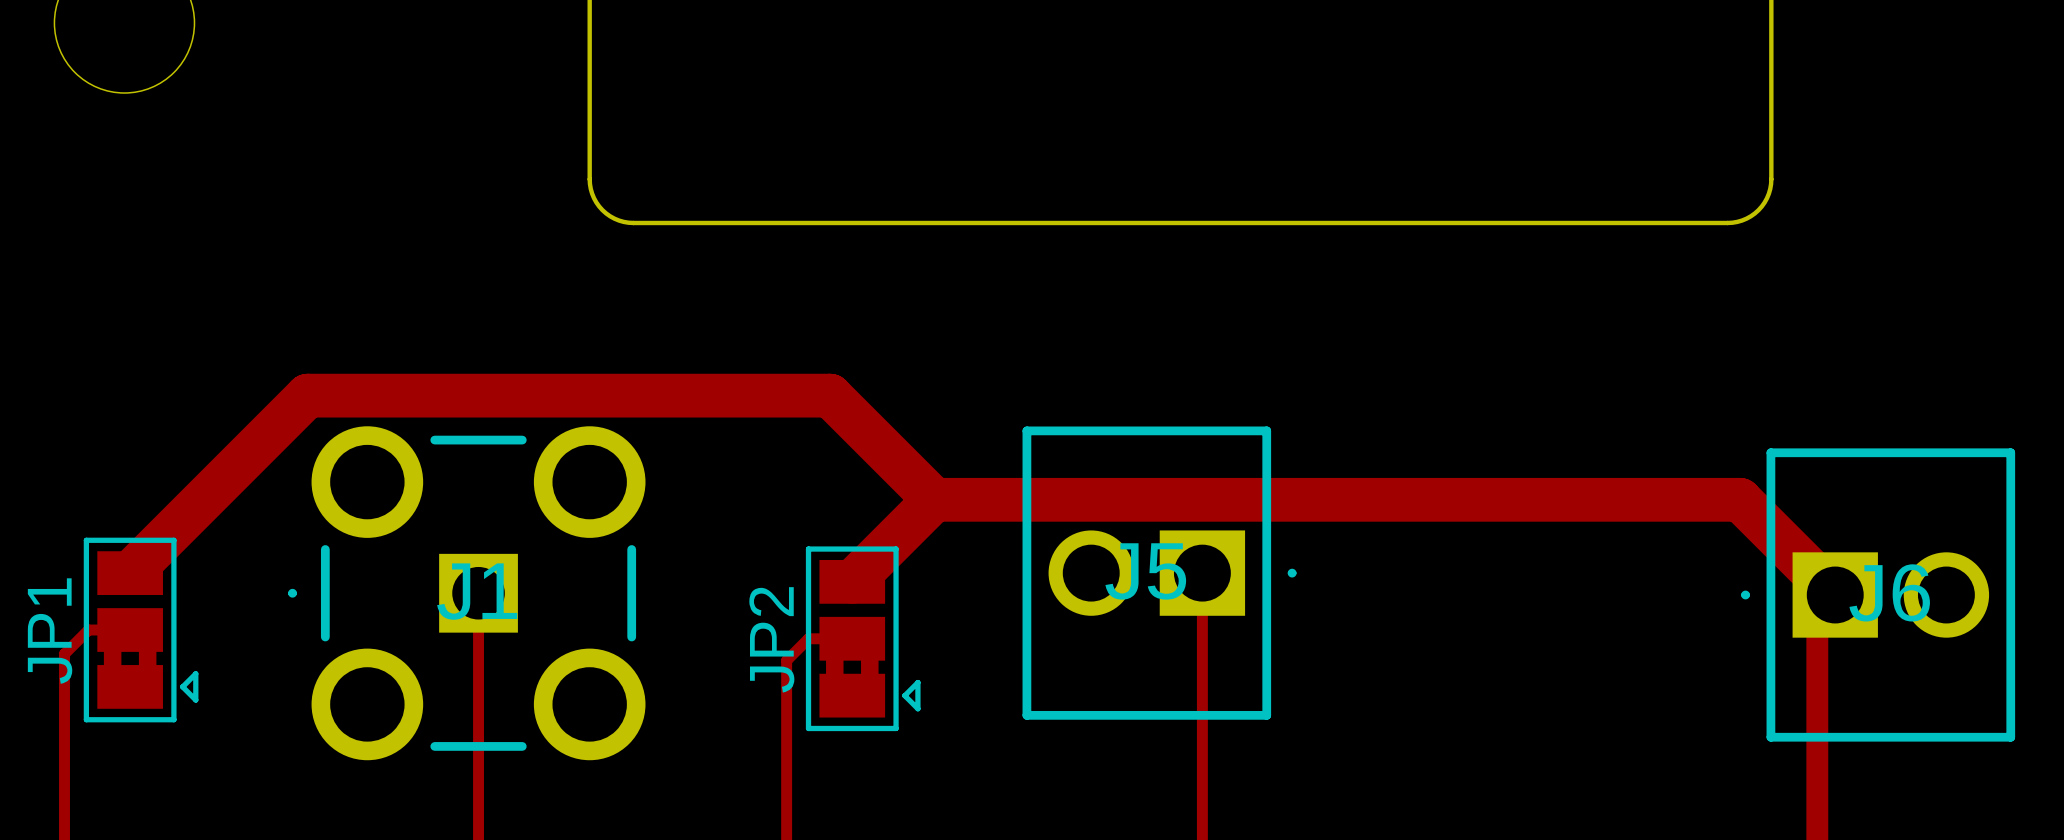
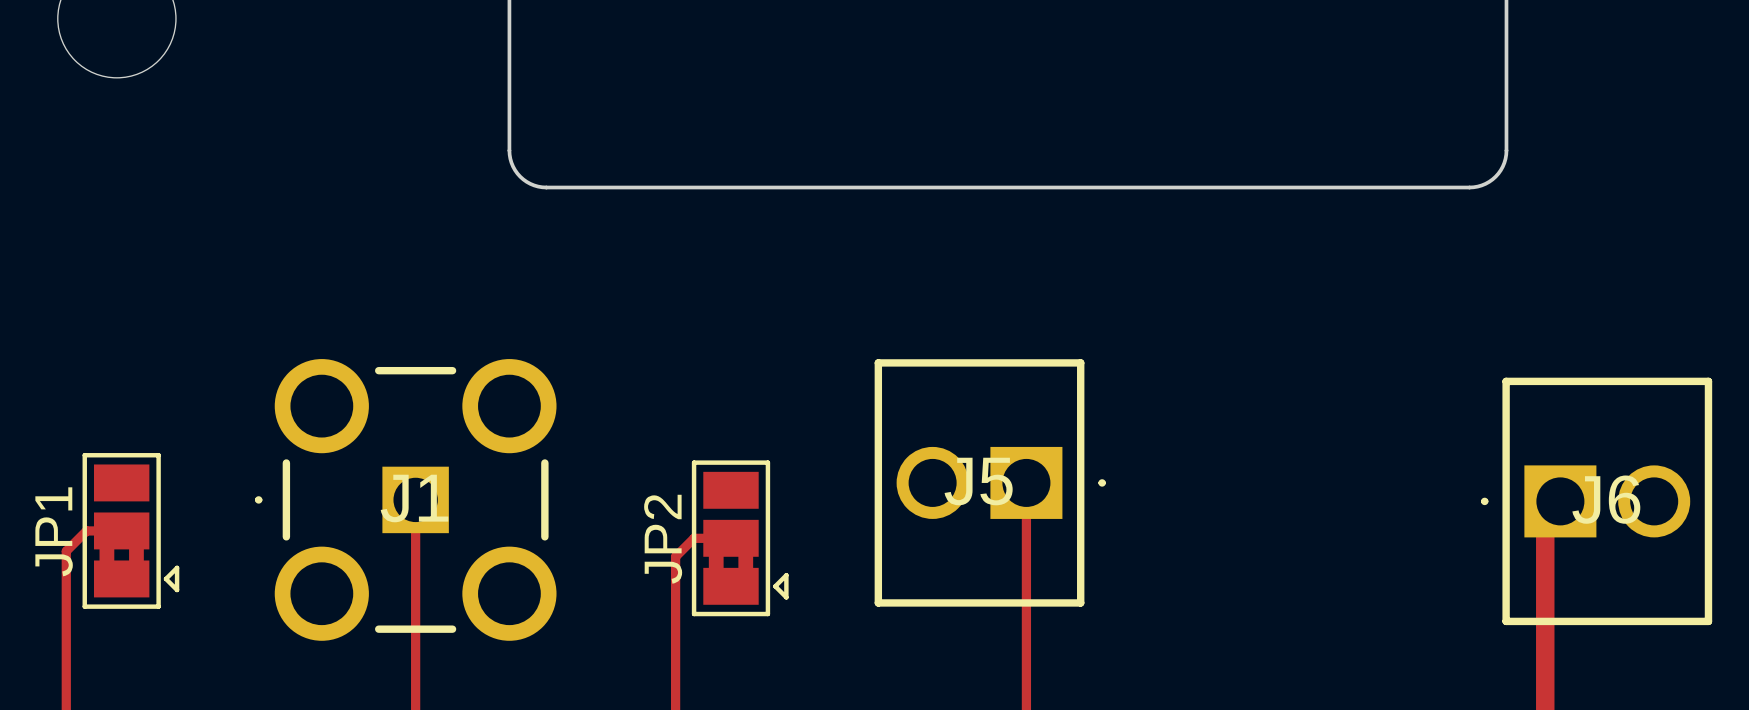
track: (934, 499) (1740, 499) (1835, 595) -> none
track: (934, 499) (830, 395) (307, 395) (130, 573) -> none
track: (934, 499) (852, 581) -> none

